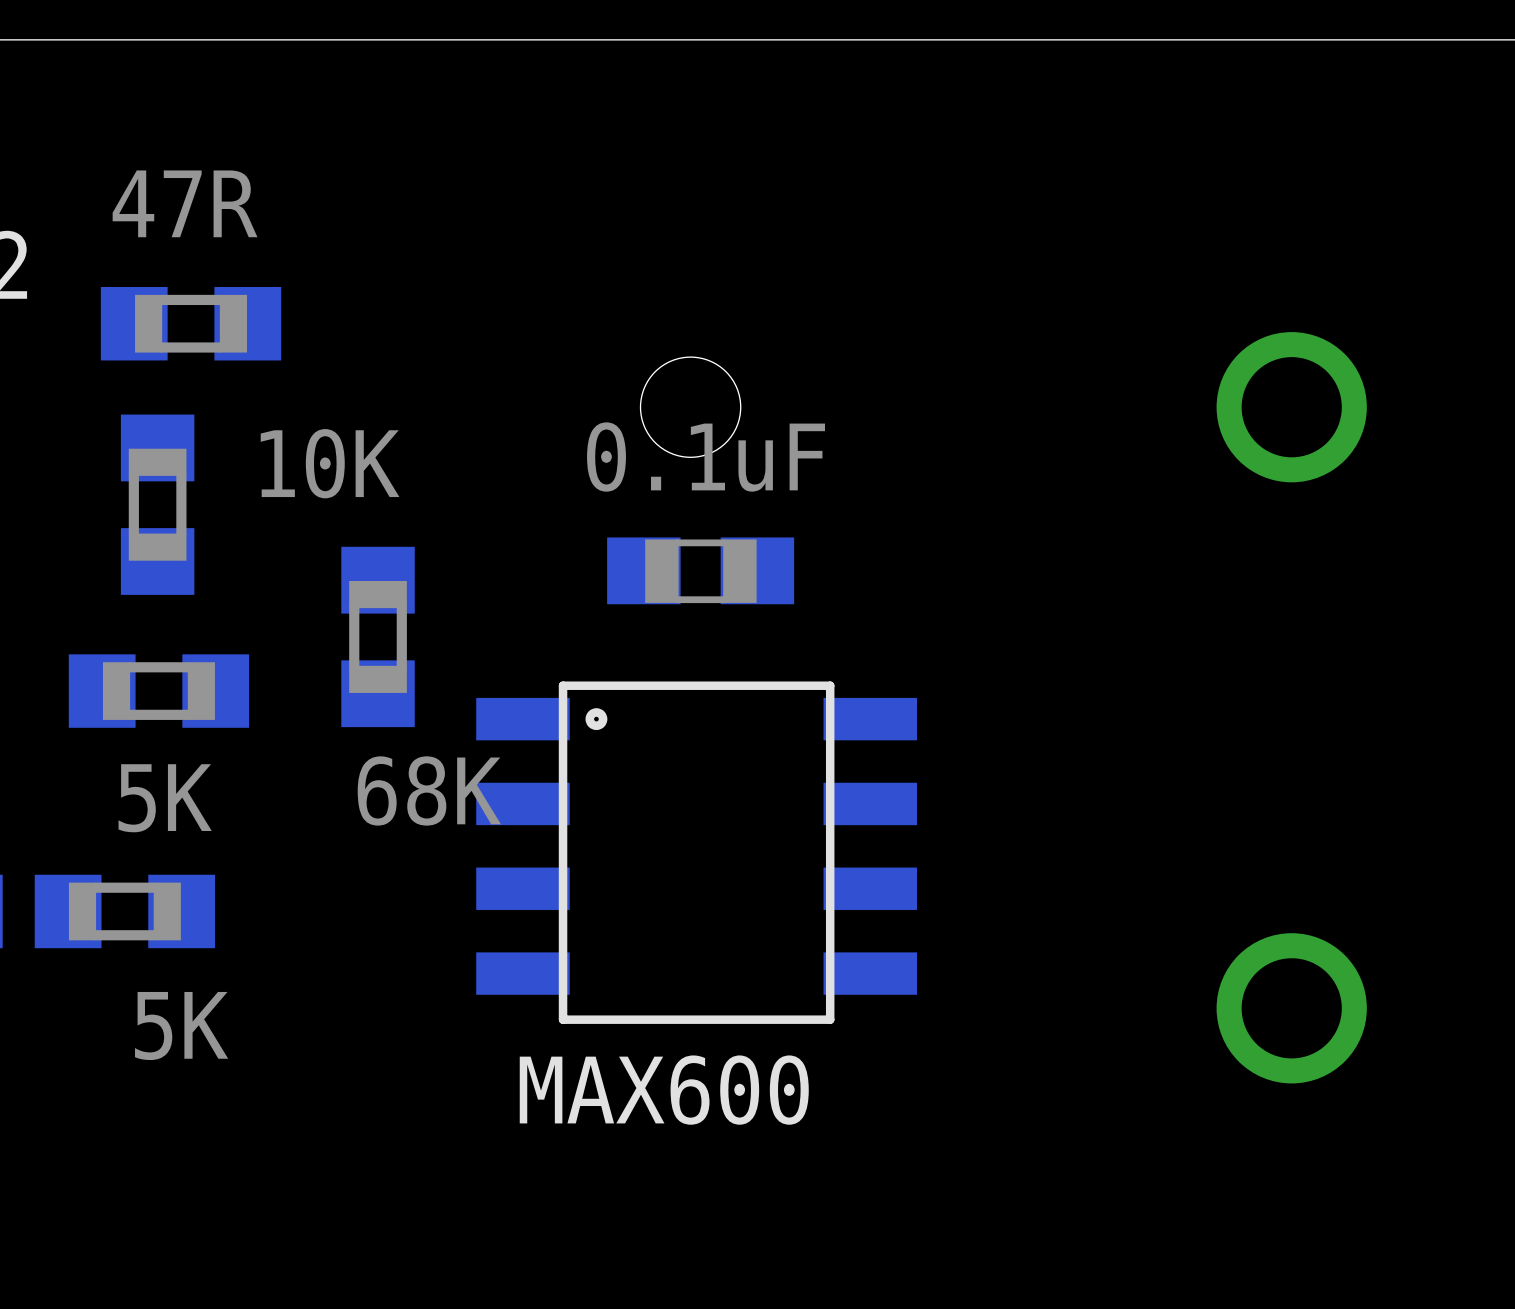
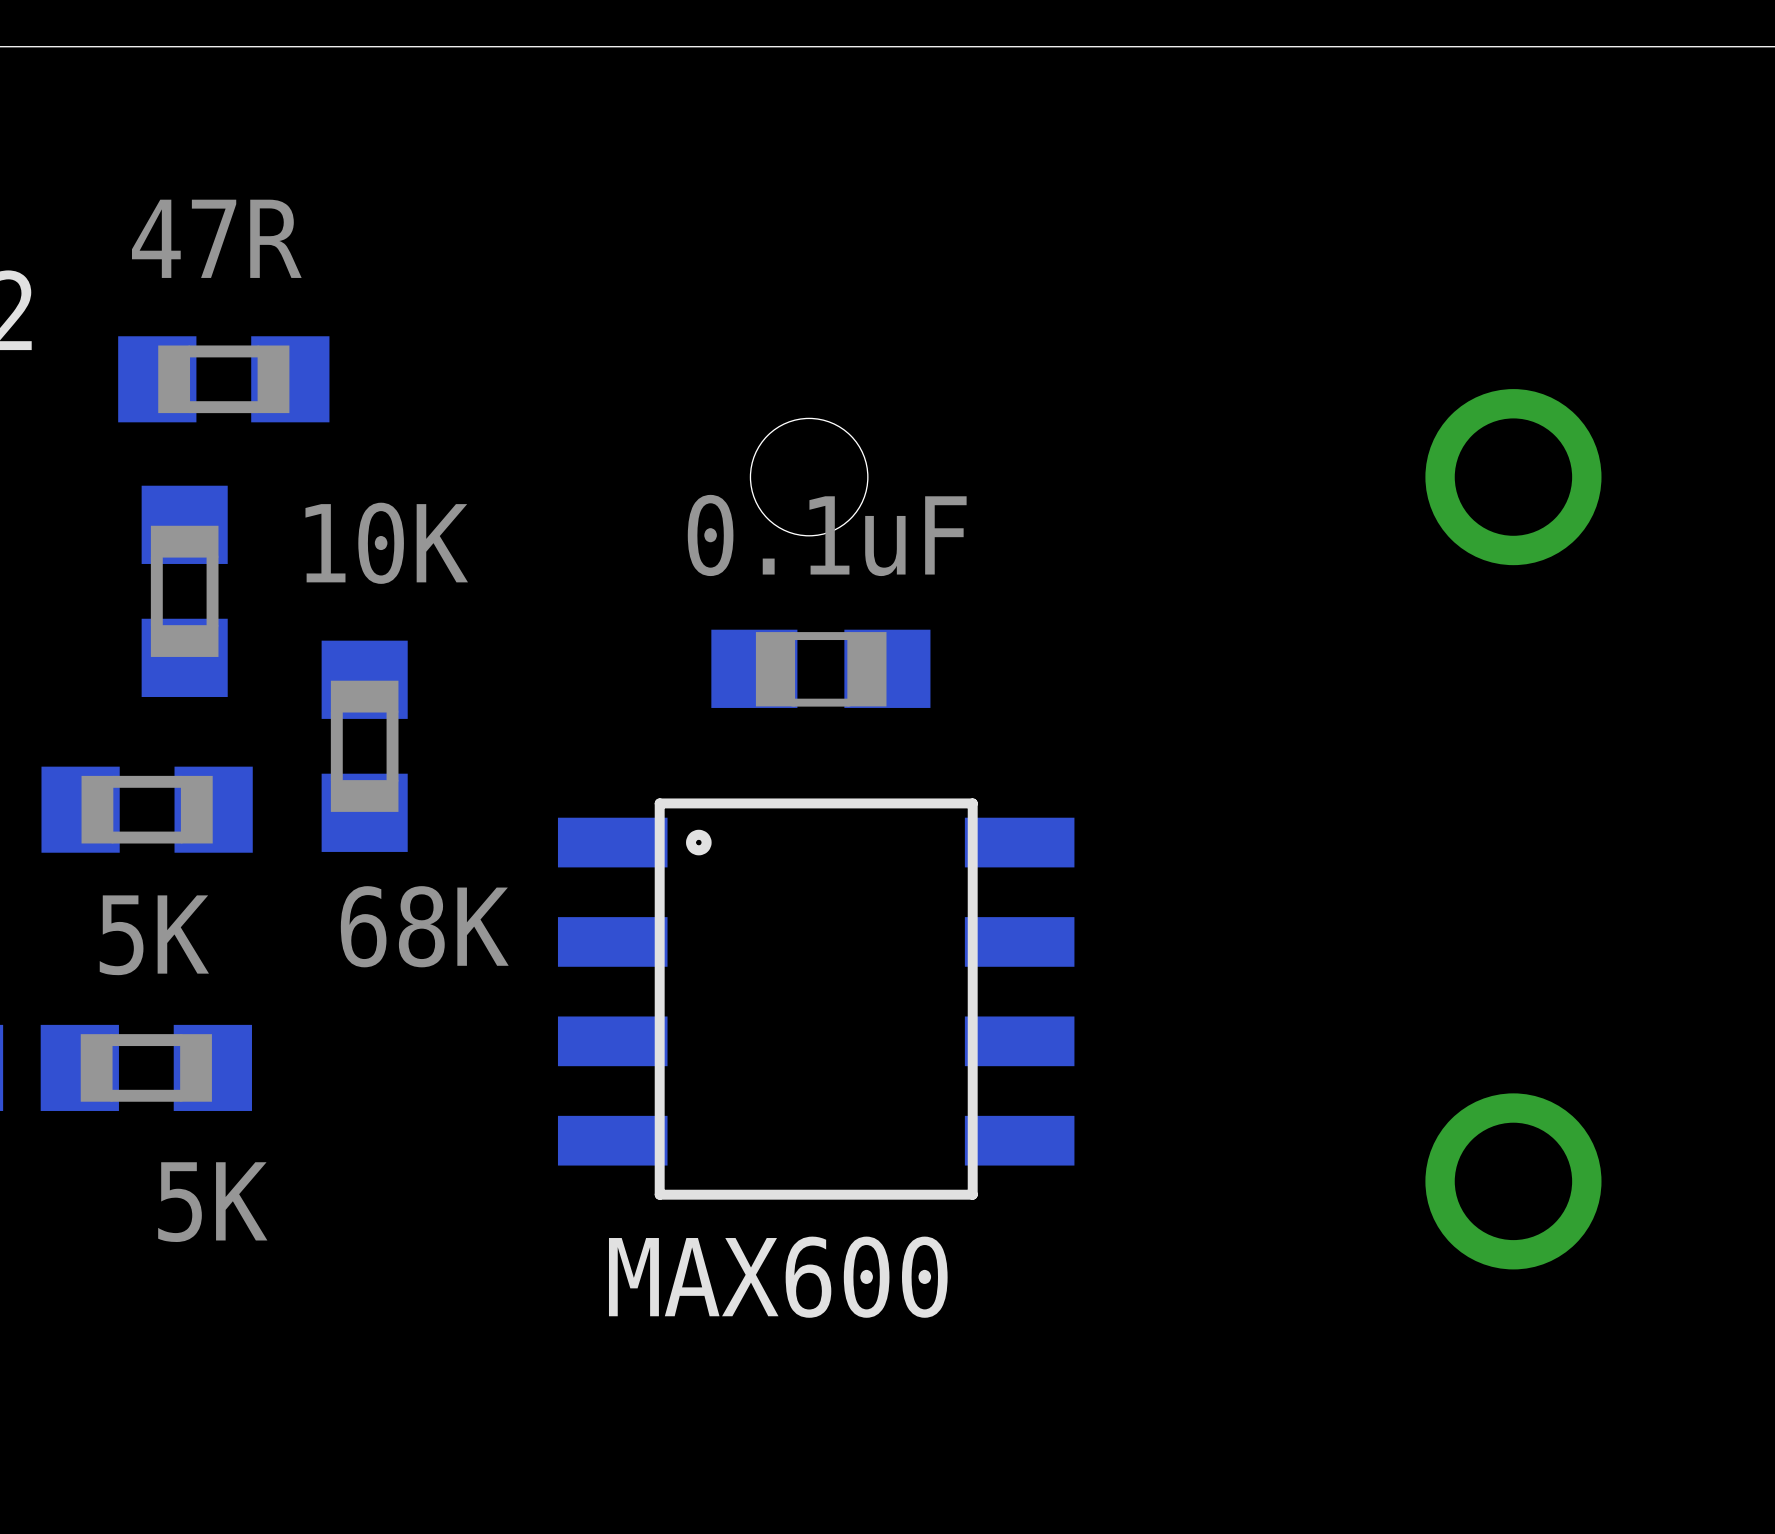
part position: (378, 636) -> (364, 746)
part position: (158, 691) -> (147, 809)

